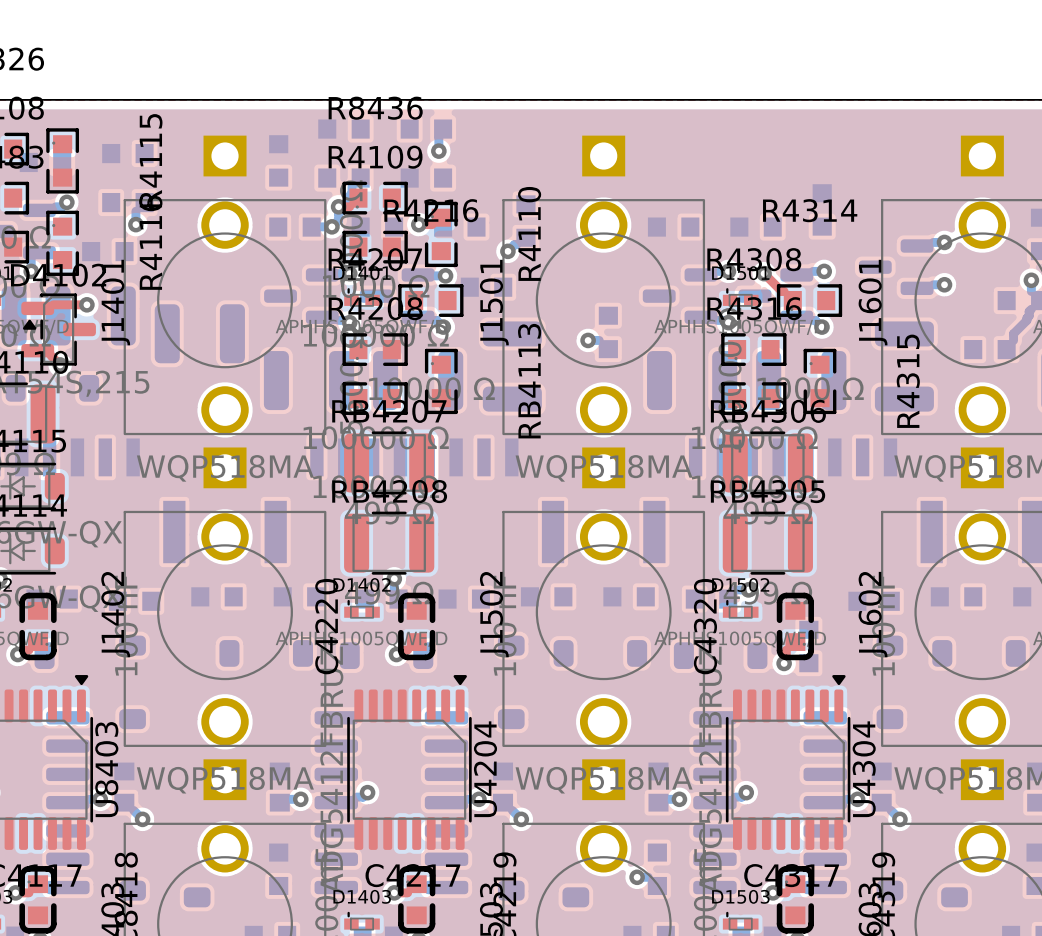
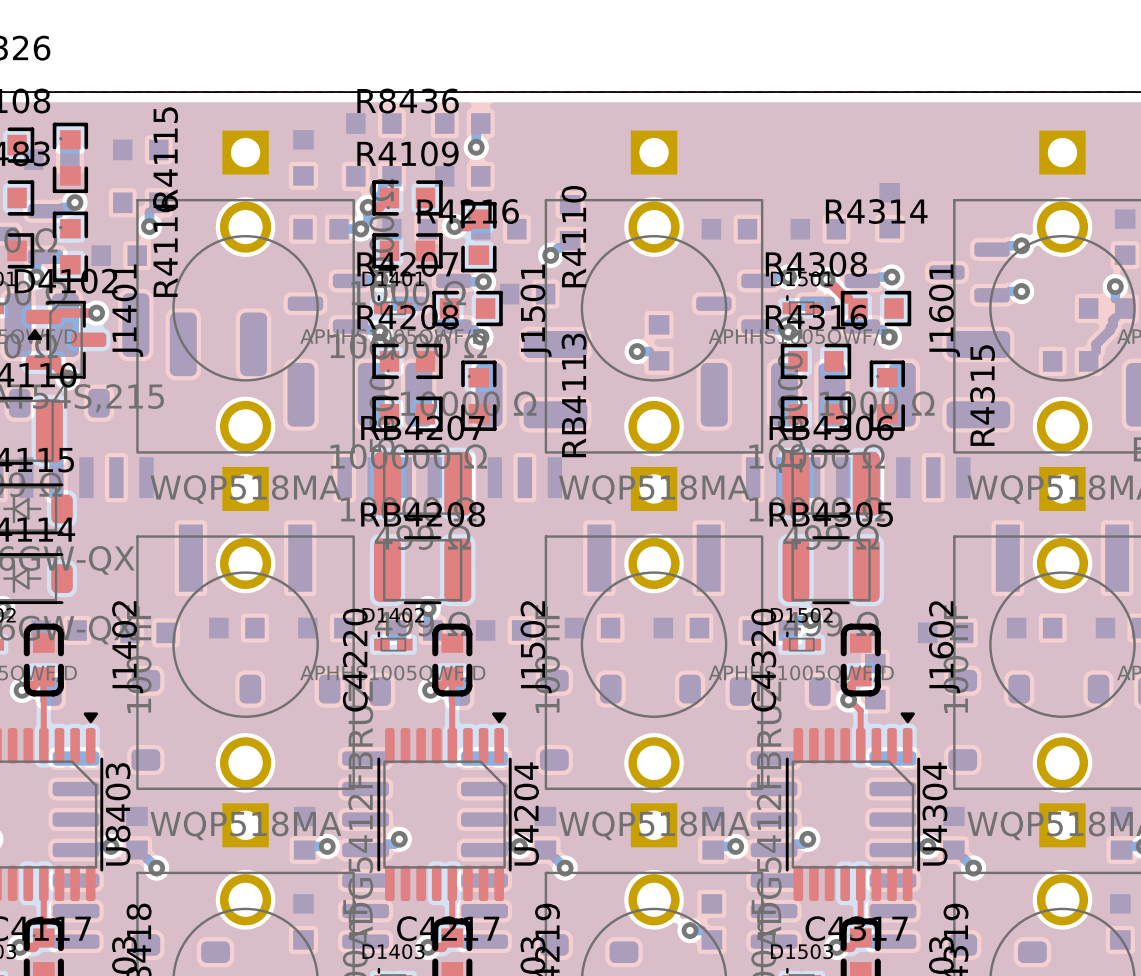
top track: none -> (43, 685) (43, 728)
top track: none -> (452, 685) (452, 728)
top track: none -> (849, 699) (860, 710) (860, 728)
top track: none -> (43, 900) (43, 929)
top track: none -> (452, 900) (452, 929)
top track: none -> (860, 900) (860, 929)

